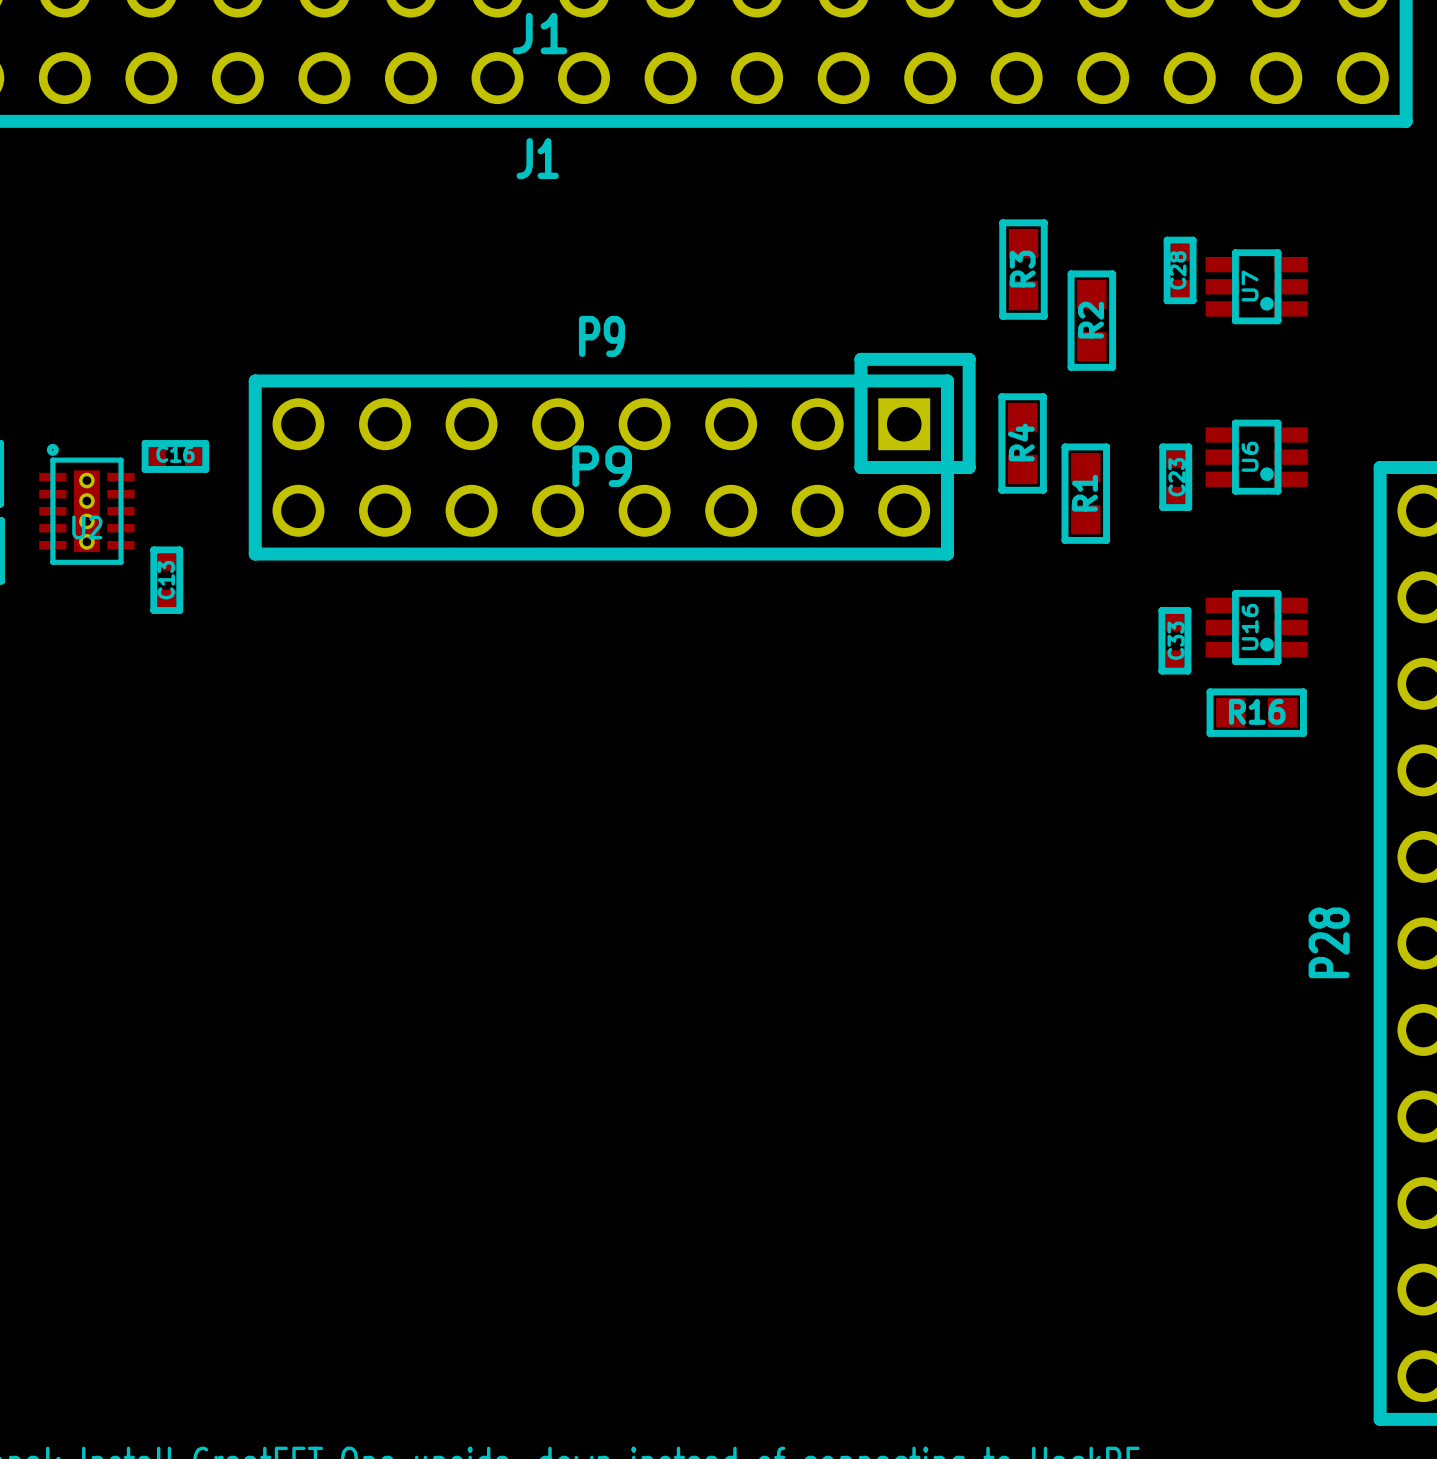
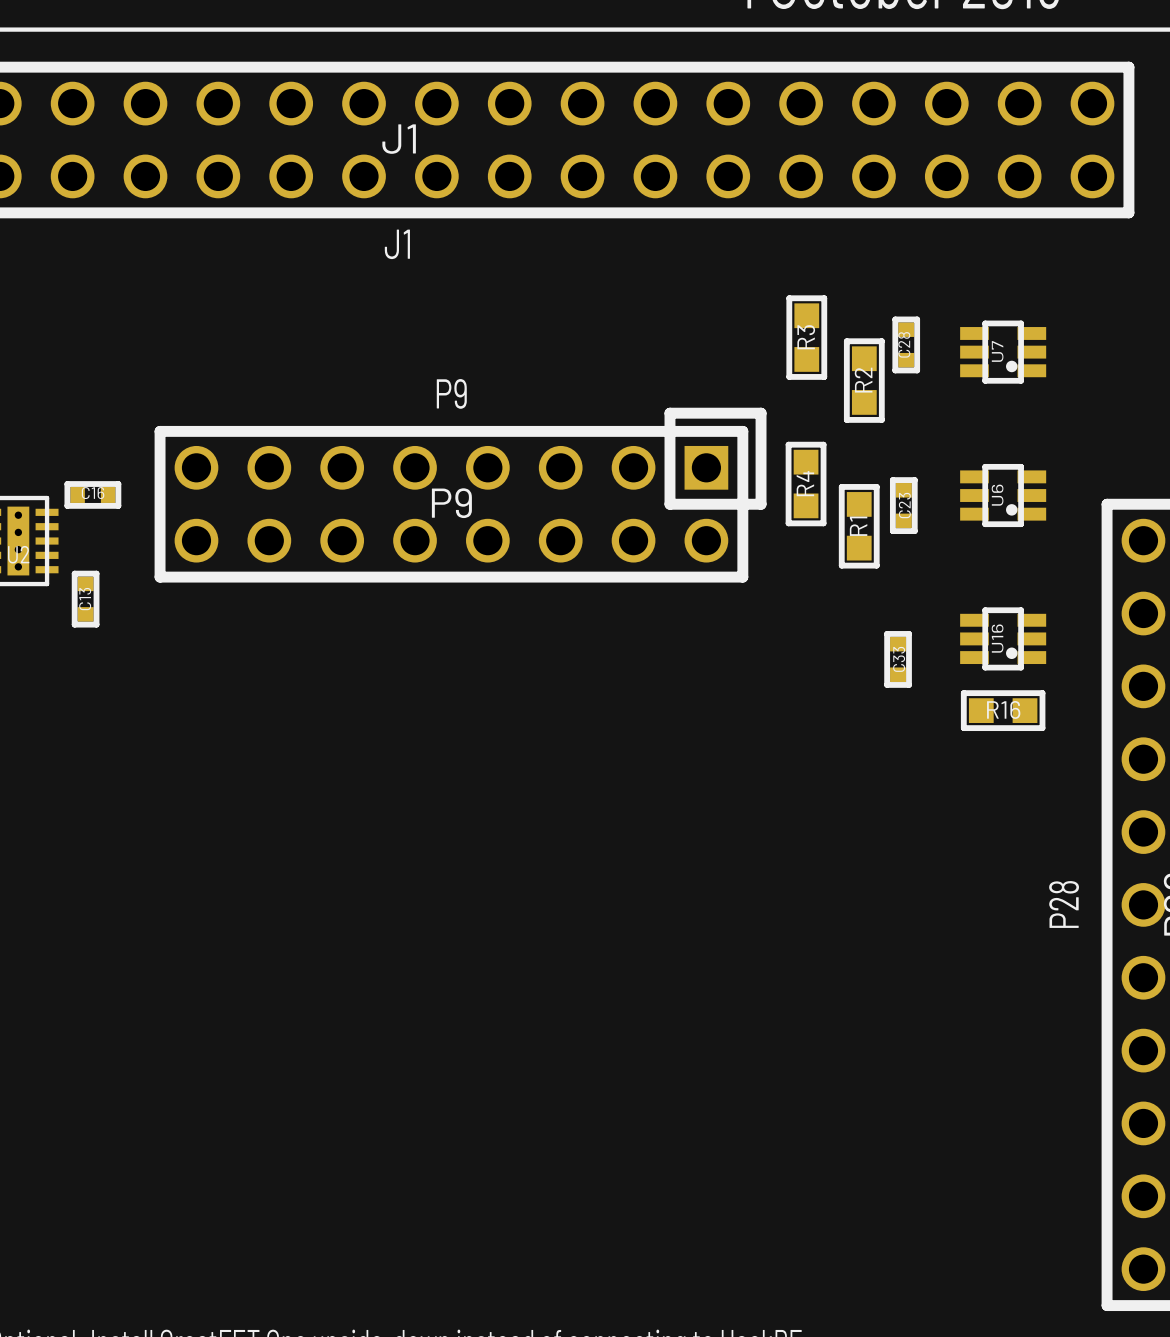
C28 position: (1180, 270) -> (906, 344)
C23 position: (1175, 477) -> (903, 505)
C33 position: (1174, 640) -> (898, 659)

